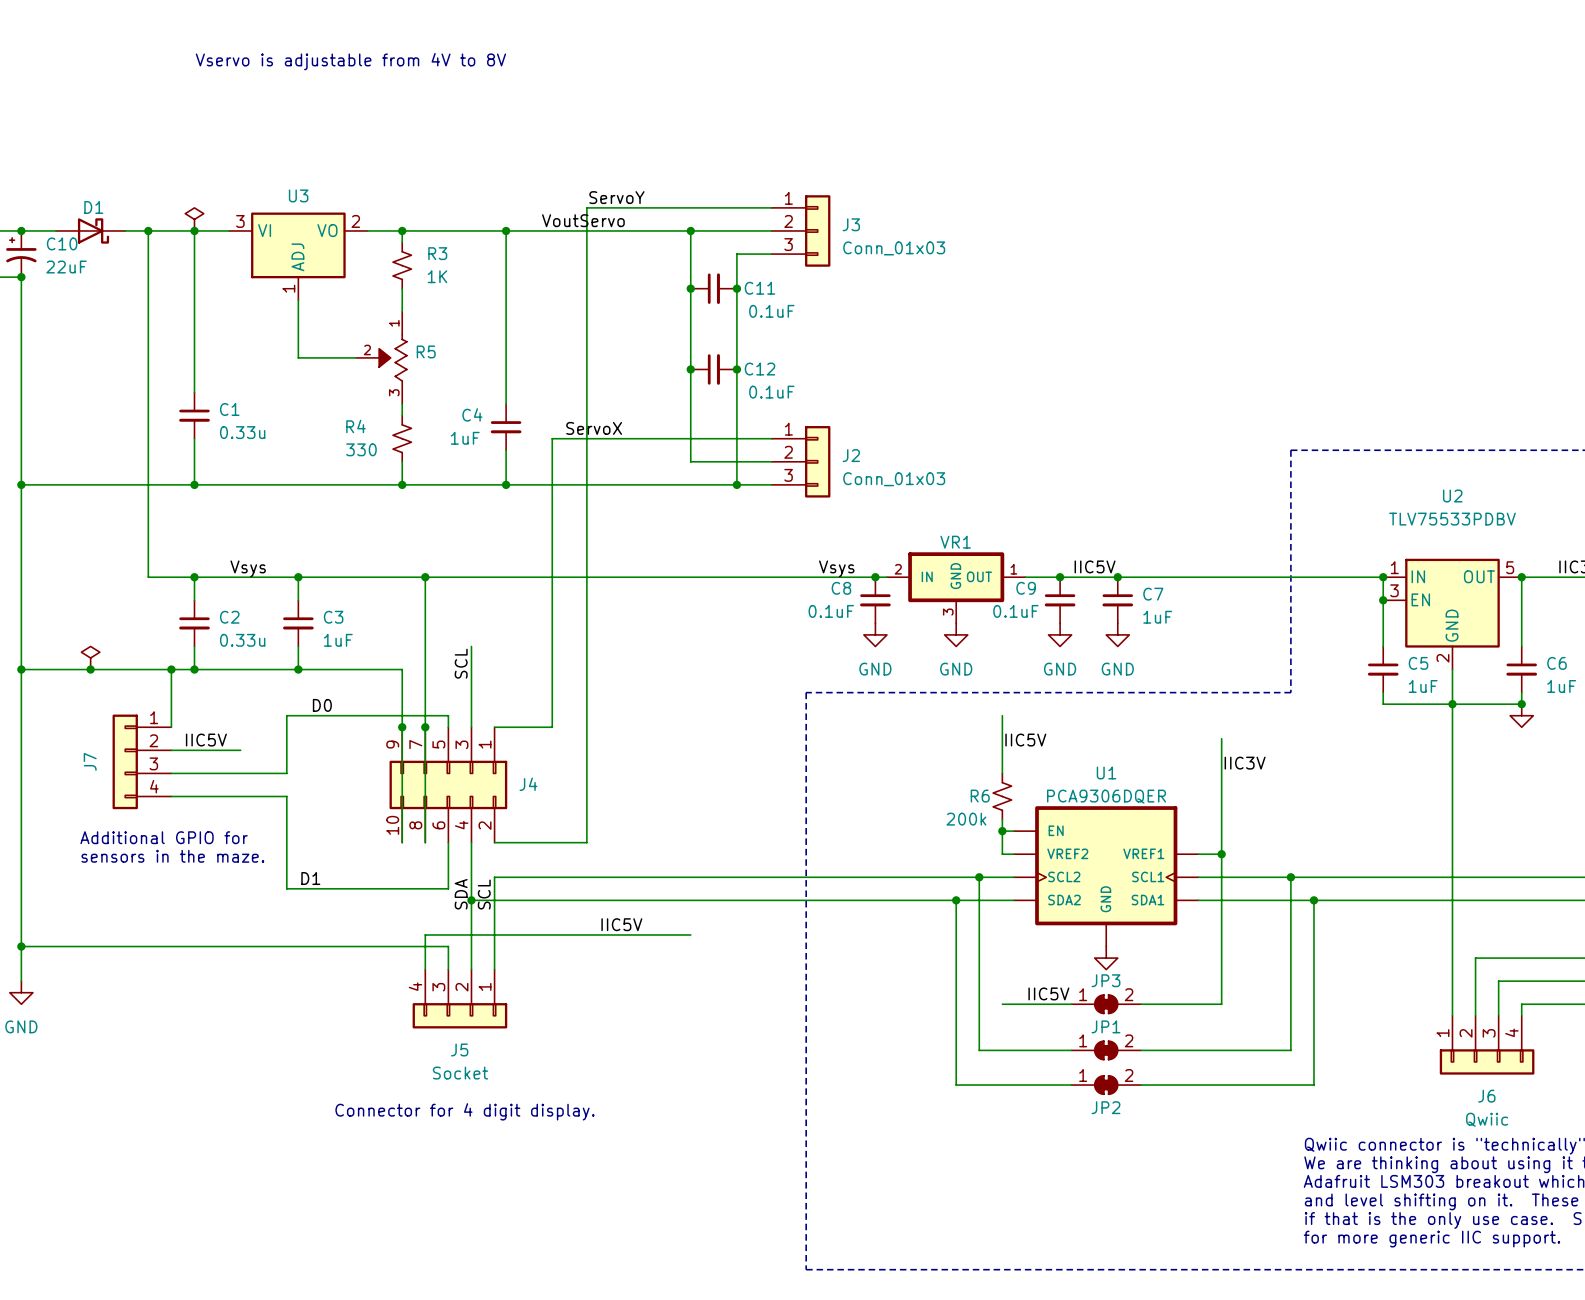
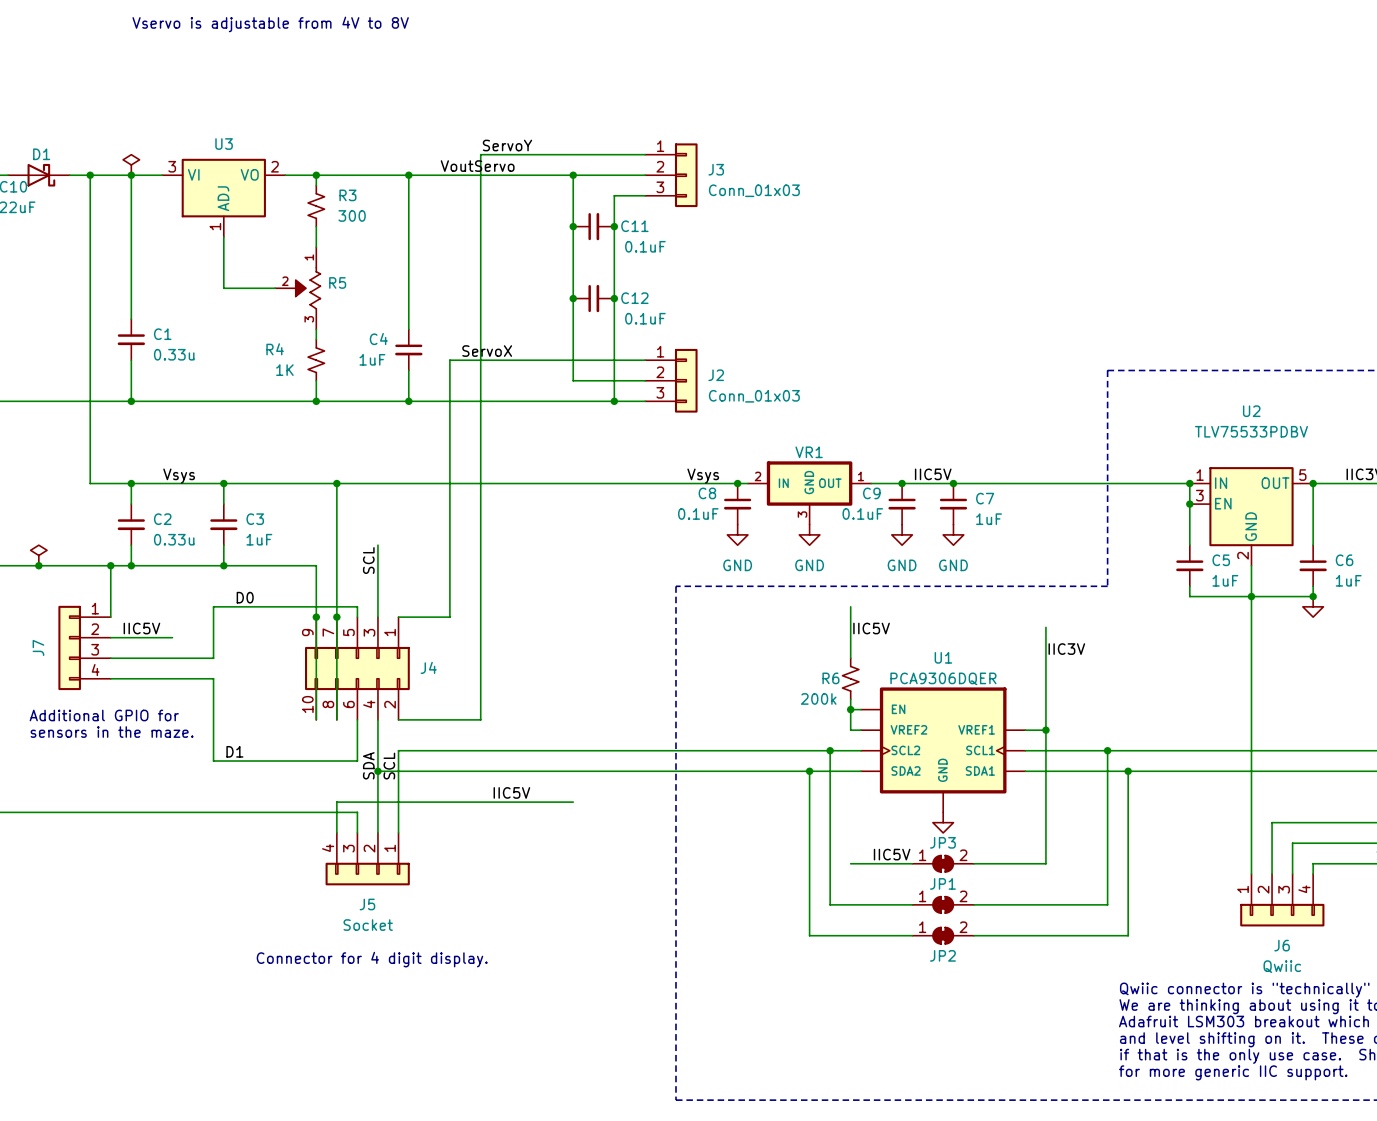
R3 value: 1K (437, 276) -> 300 (352, 215)
R4 value: 330 (361, 449) -> 1K (284, 370)

